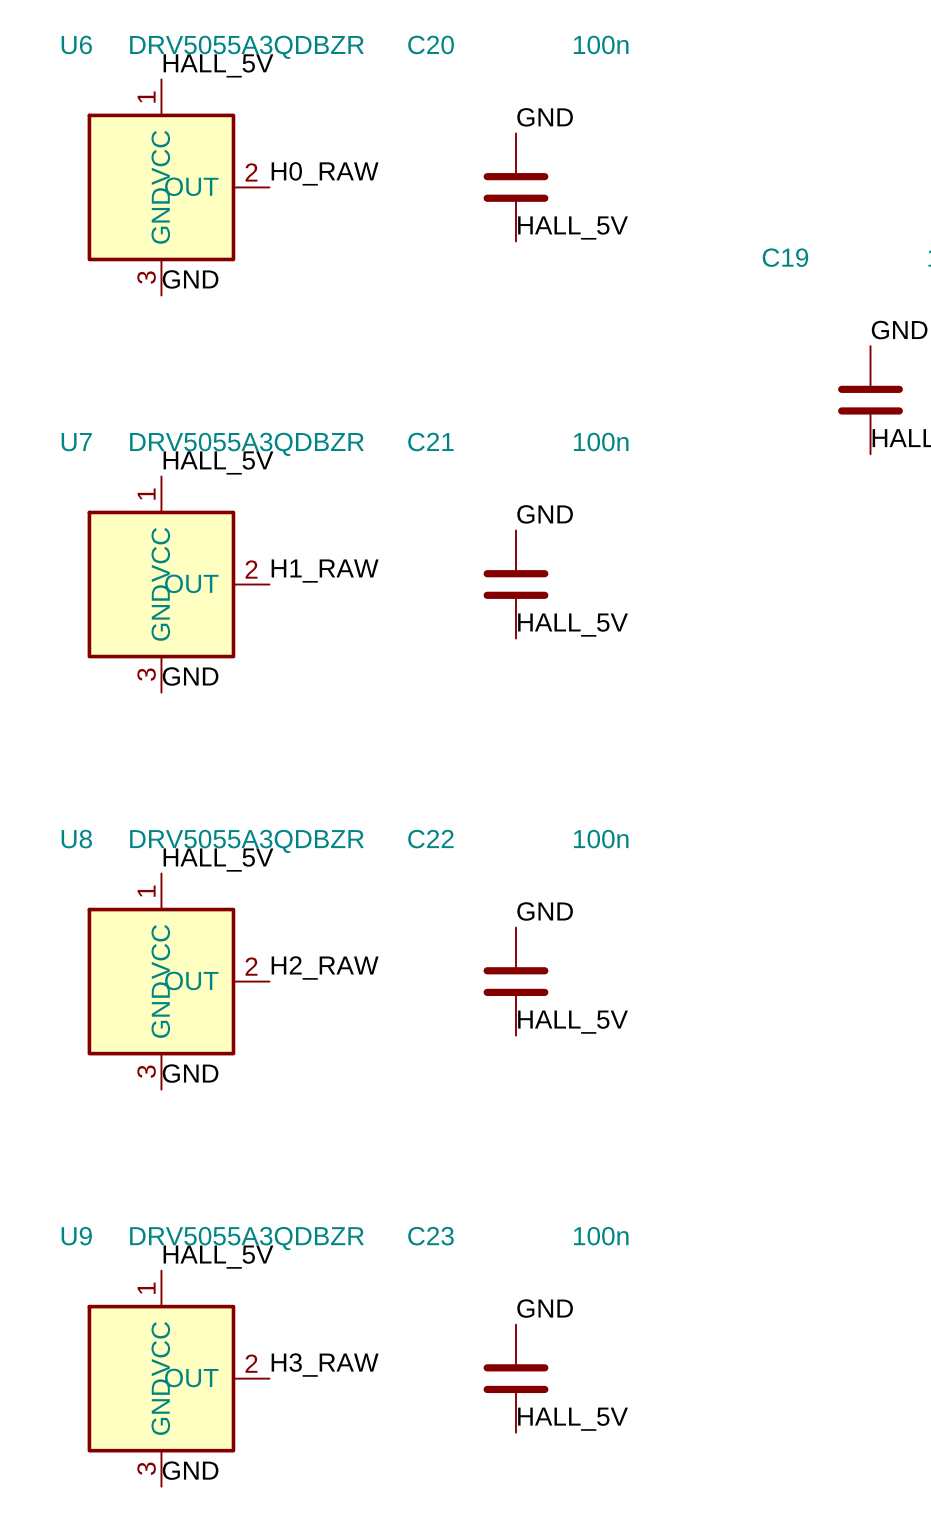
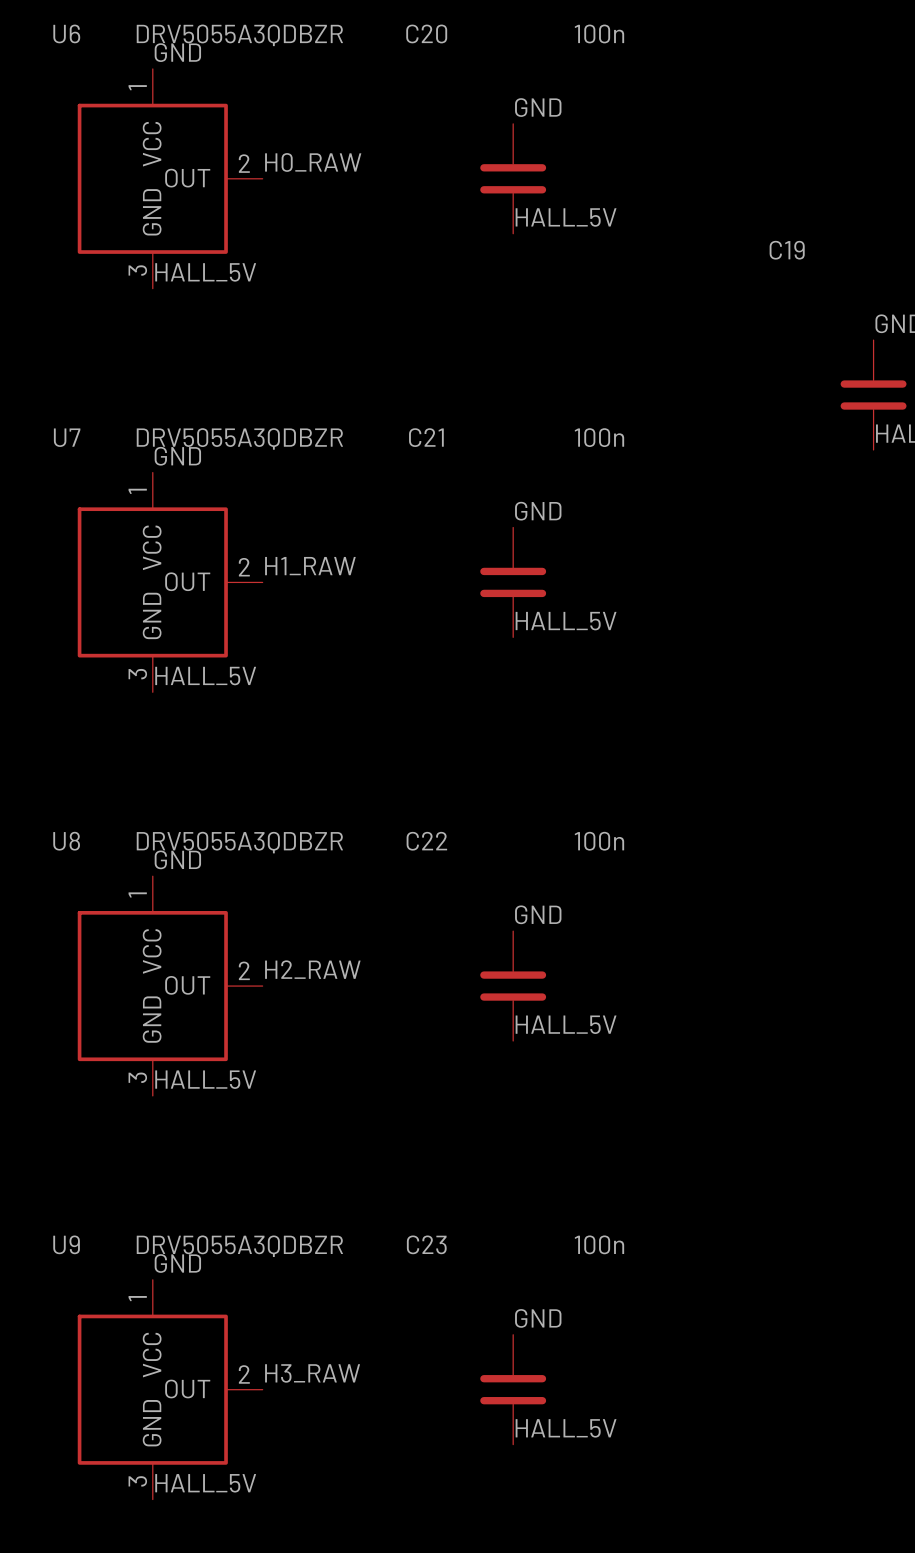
label: HALL_5V (218, 65) -> GND (177, 52)
label: GND (190, 279) -> HALL_5V (205, 272)
label: HALL_5V (218, 462) -> GND (177, 456)
label: GND (190, 676) -> HALL_5V (205, 676)
label: HALL_5V (218, 860) -> GND (177, 859)
label: GND (190, 1073) -> HALL_5V (205, 1079)
label: HALL_5V (218, 1257) -> GND (177, 1263)
label: GND (190, 1470) -> HALL_5V (205, 1483)

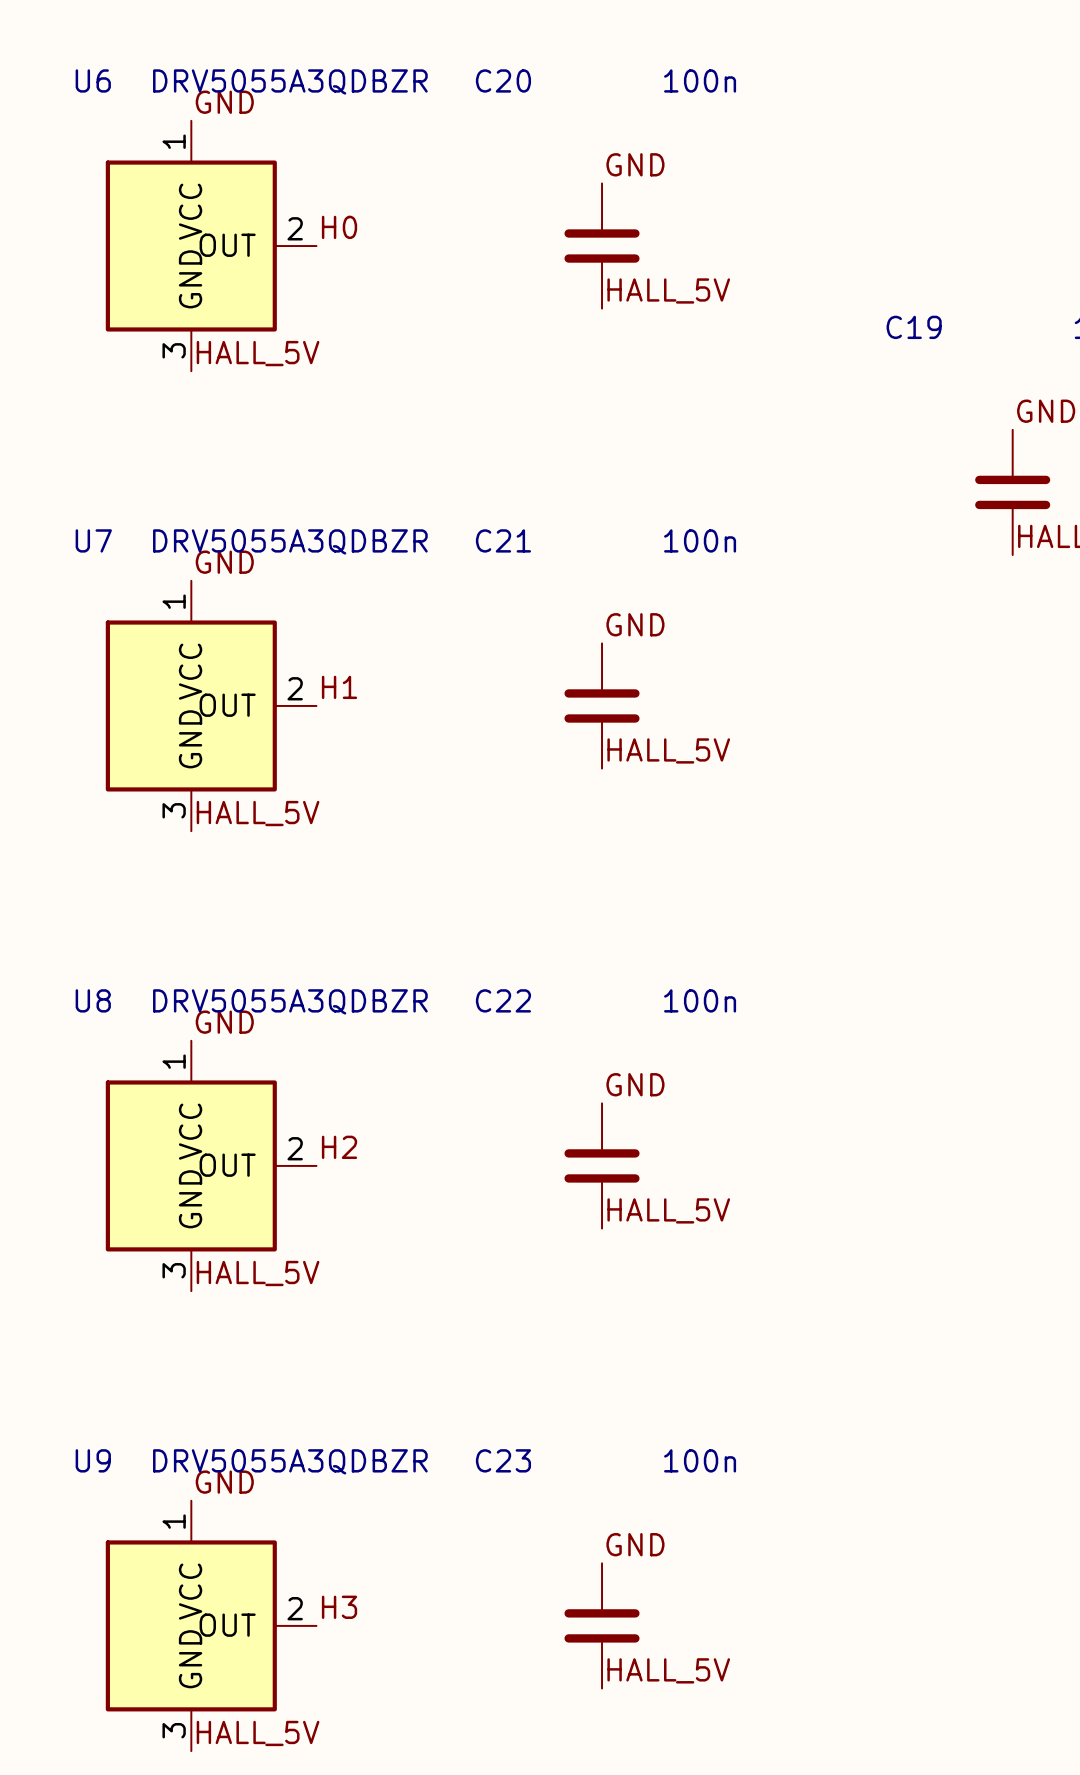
label: H0_RAW (313, 162) -> H0 (339, 227)
label: H1_RAW (310, 566) -> H1 (339, 687)
label: H2_RAW (312, 969) -> H2 (339, 1147)
label: H3_RAW (312, 1373) -> H3 (339, 1607)

